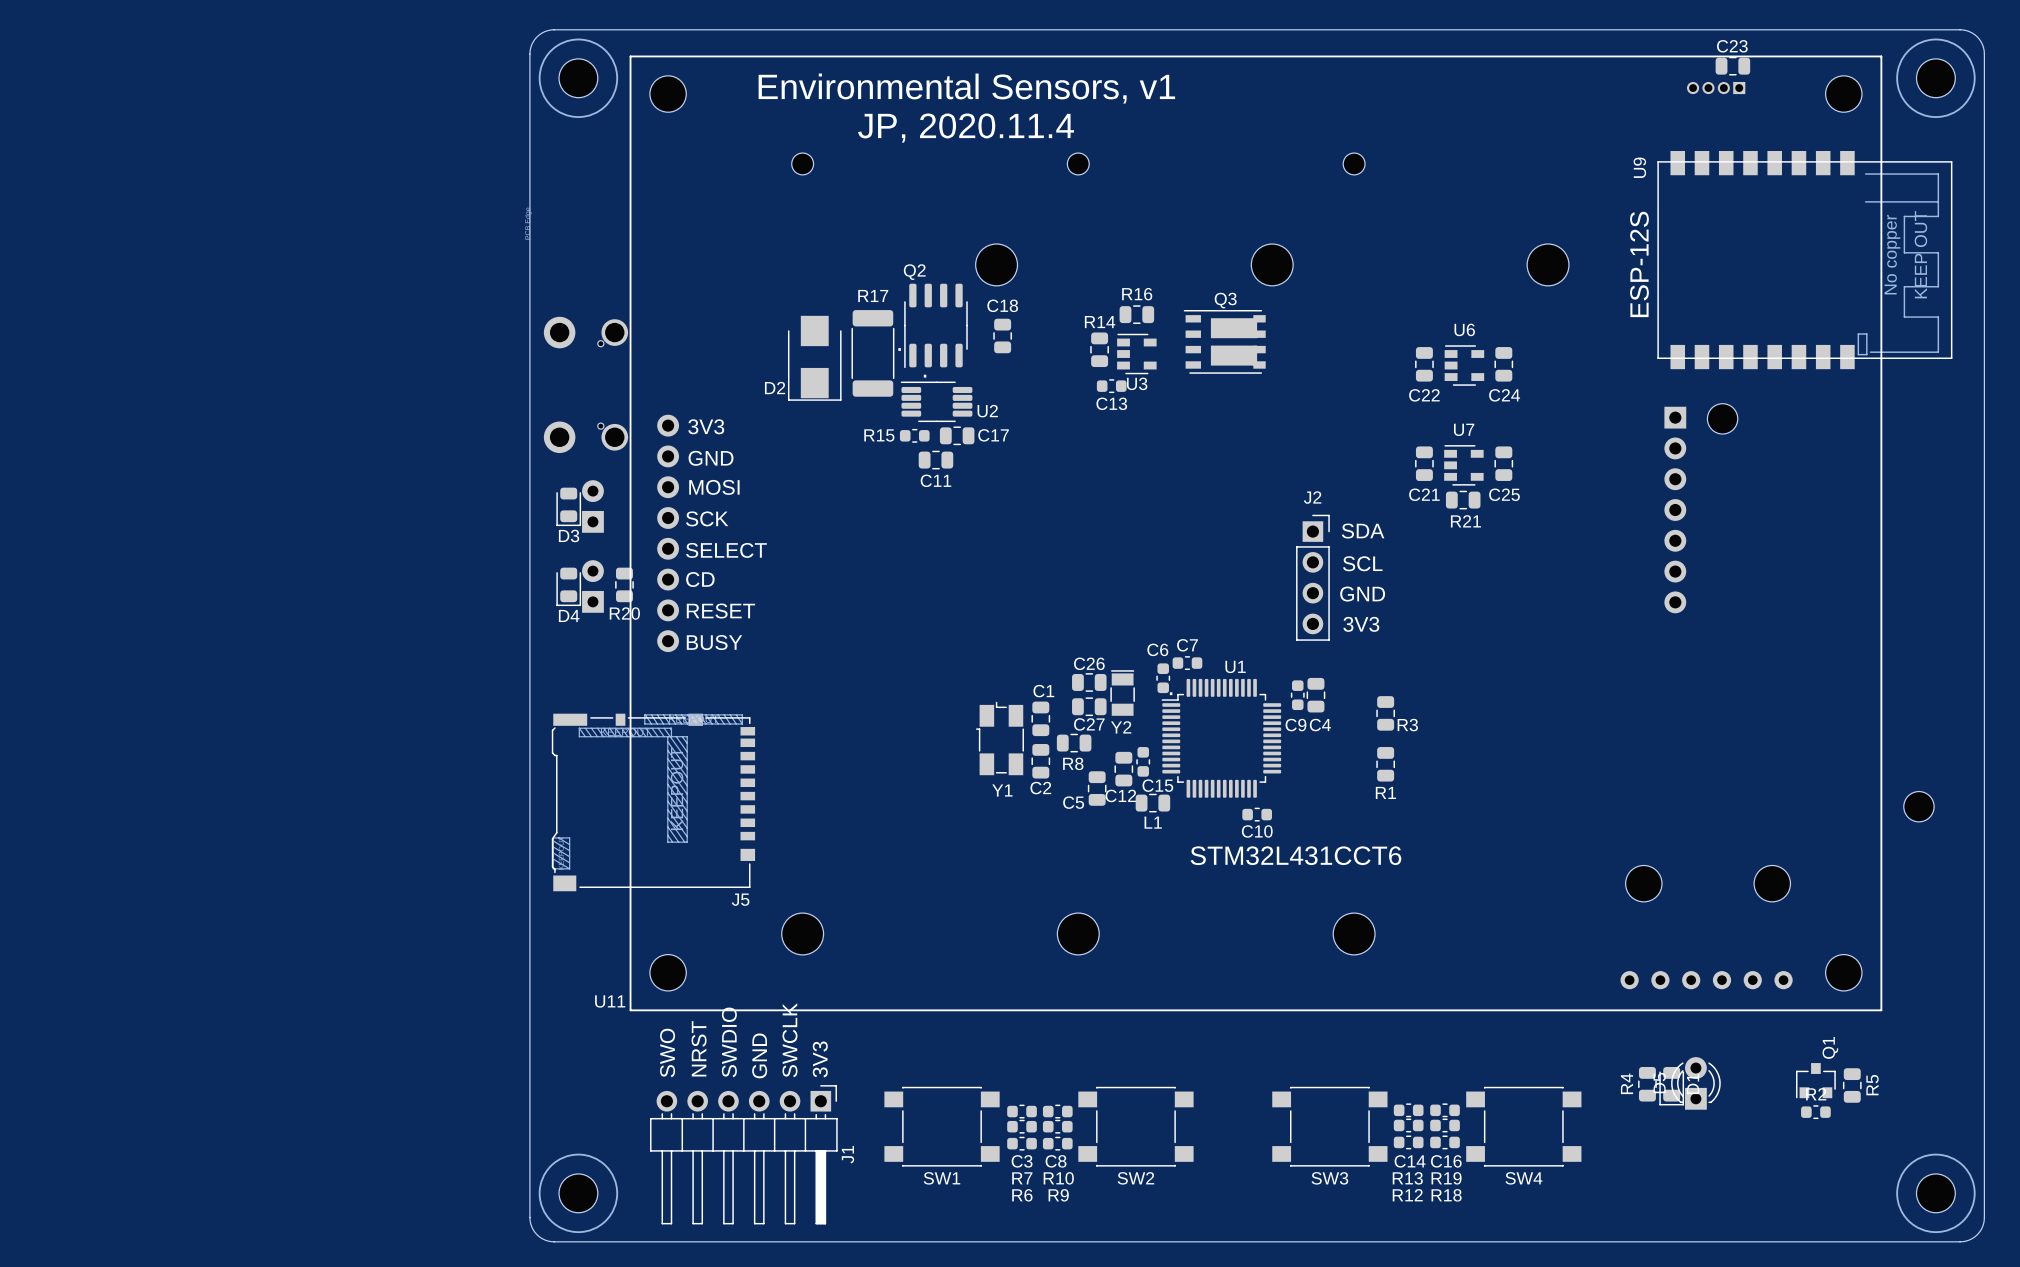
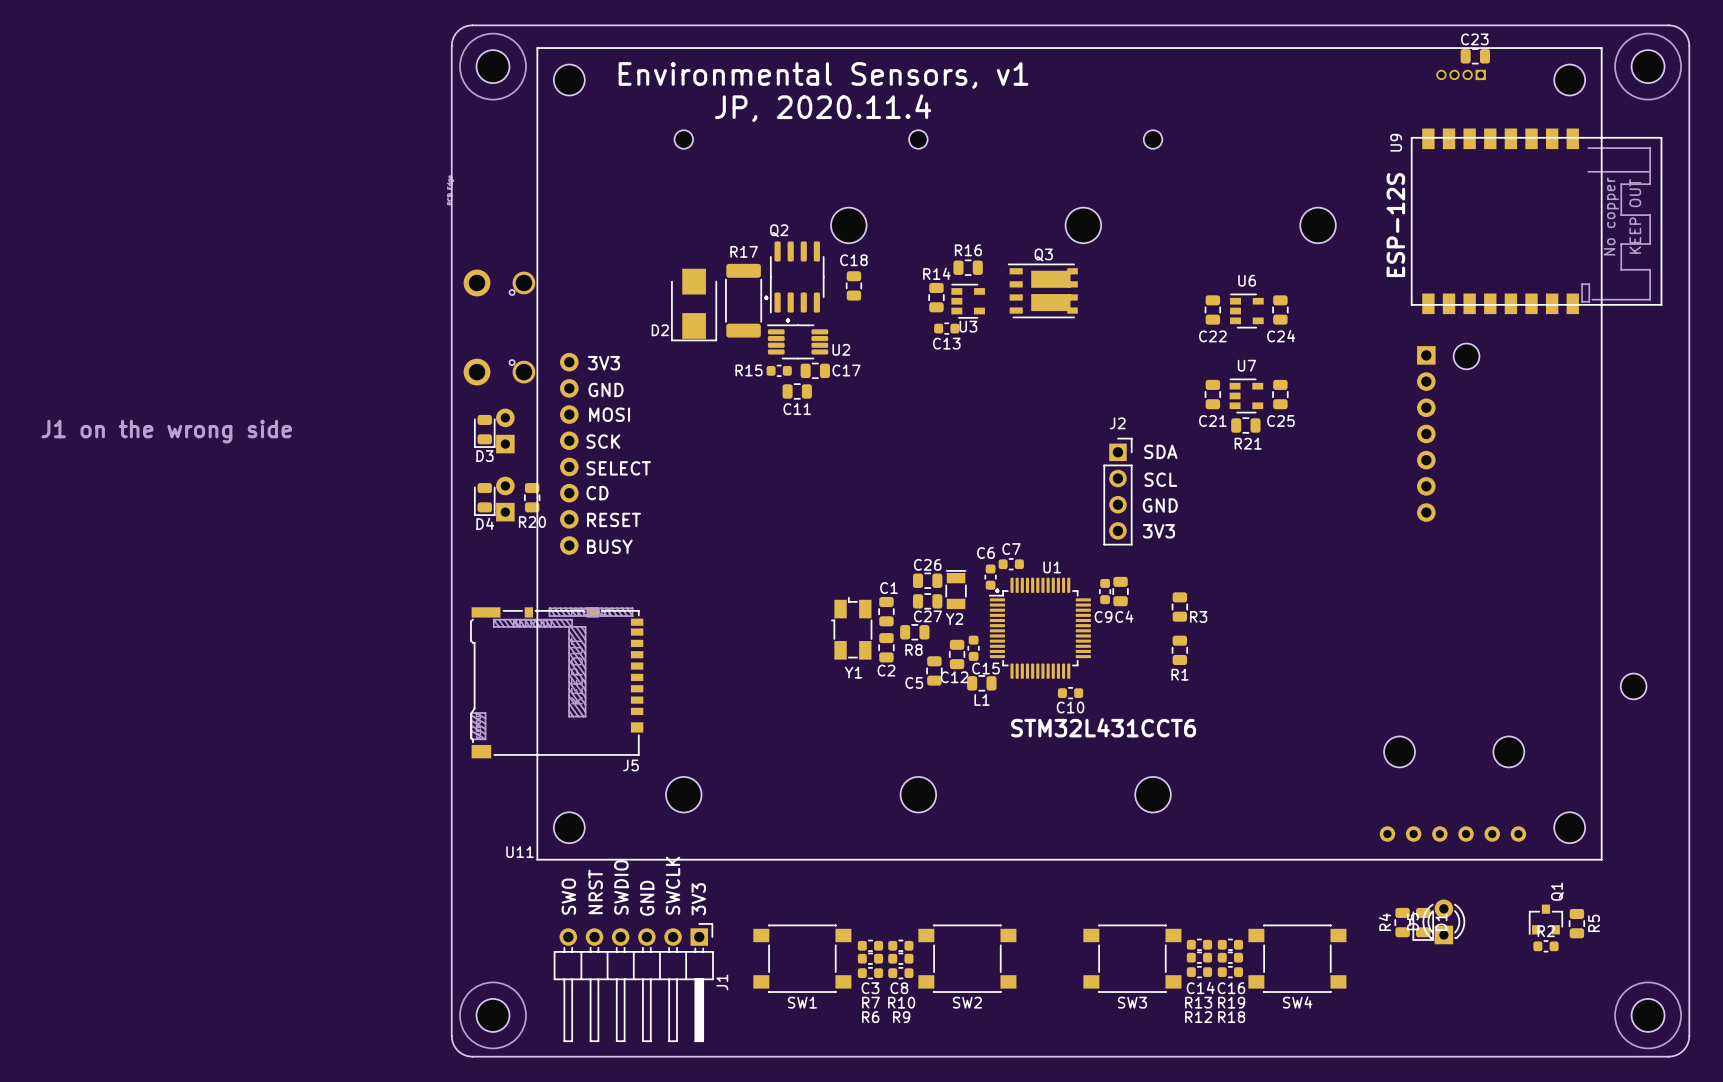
text: none -> J1 on the wrong side (166, 431)

